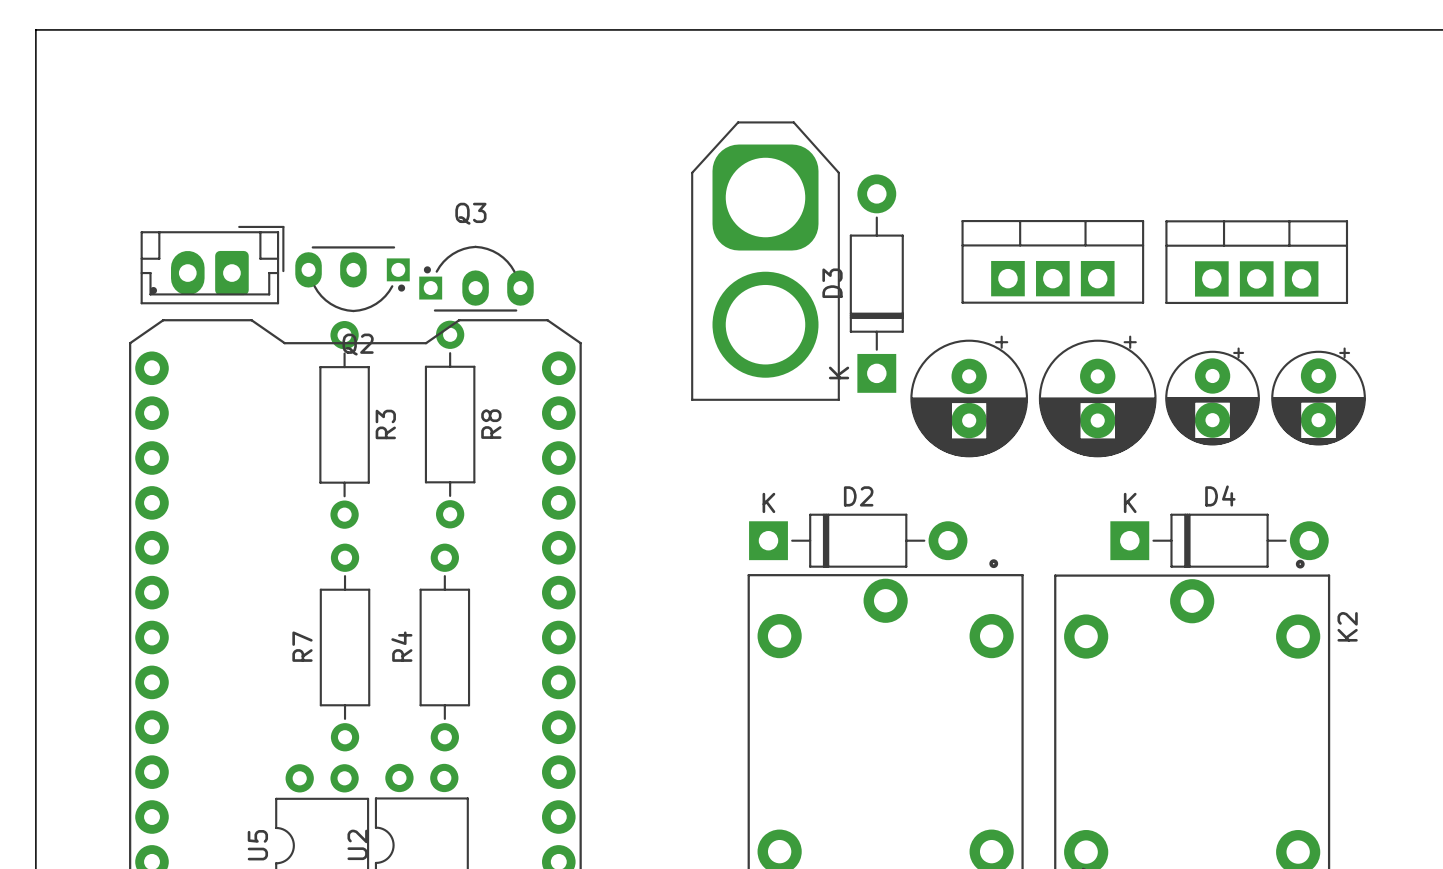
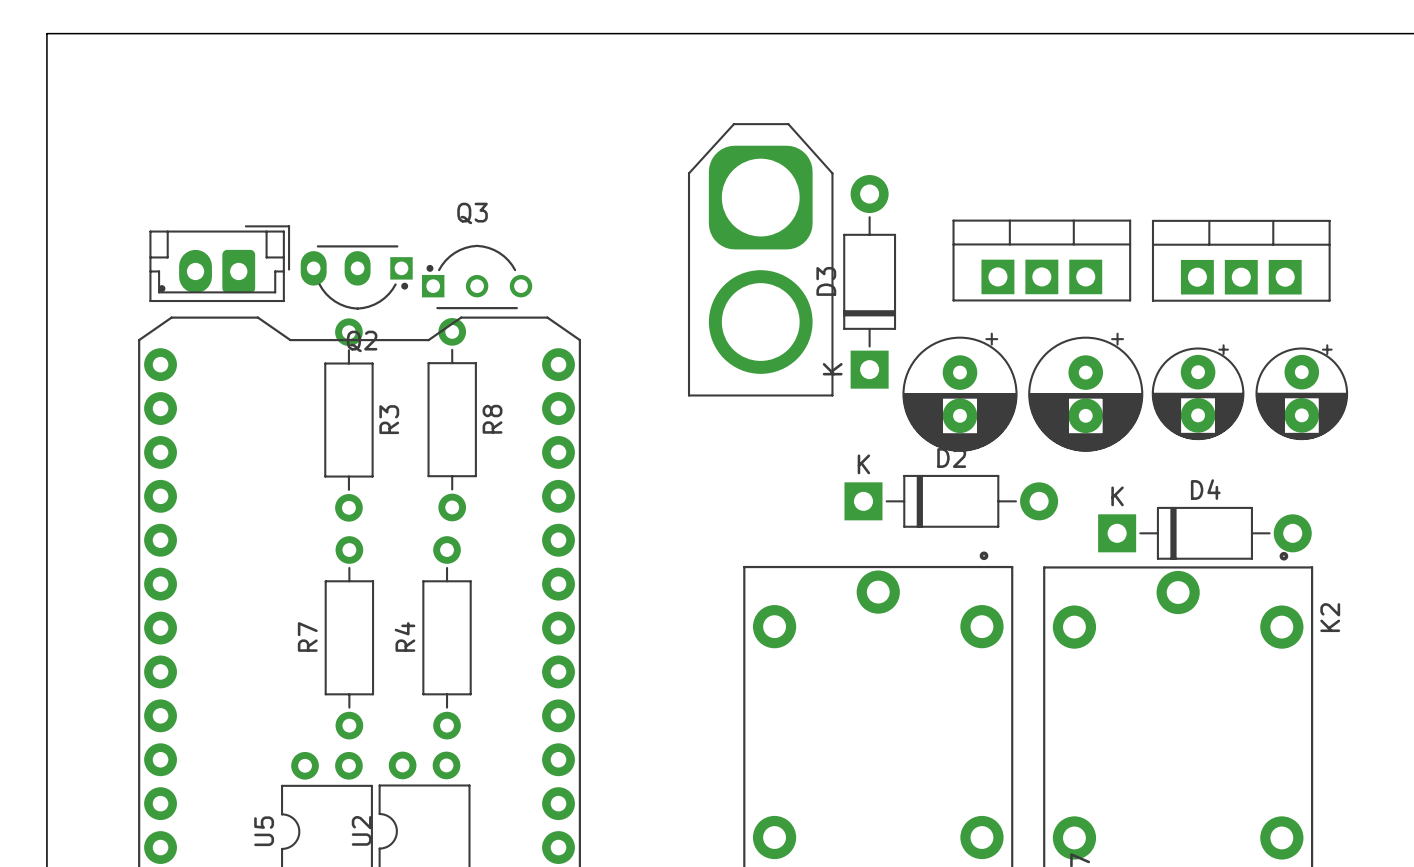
Q3 footprint: [398, 245, 534, 312] -> [401, 244, 533, 310]
D2 position: (858, 540) -> (951, 501)

